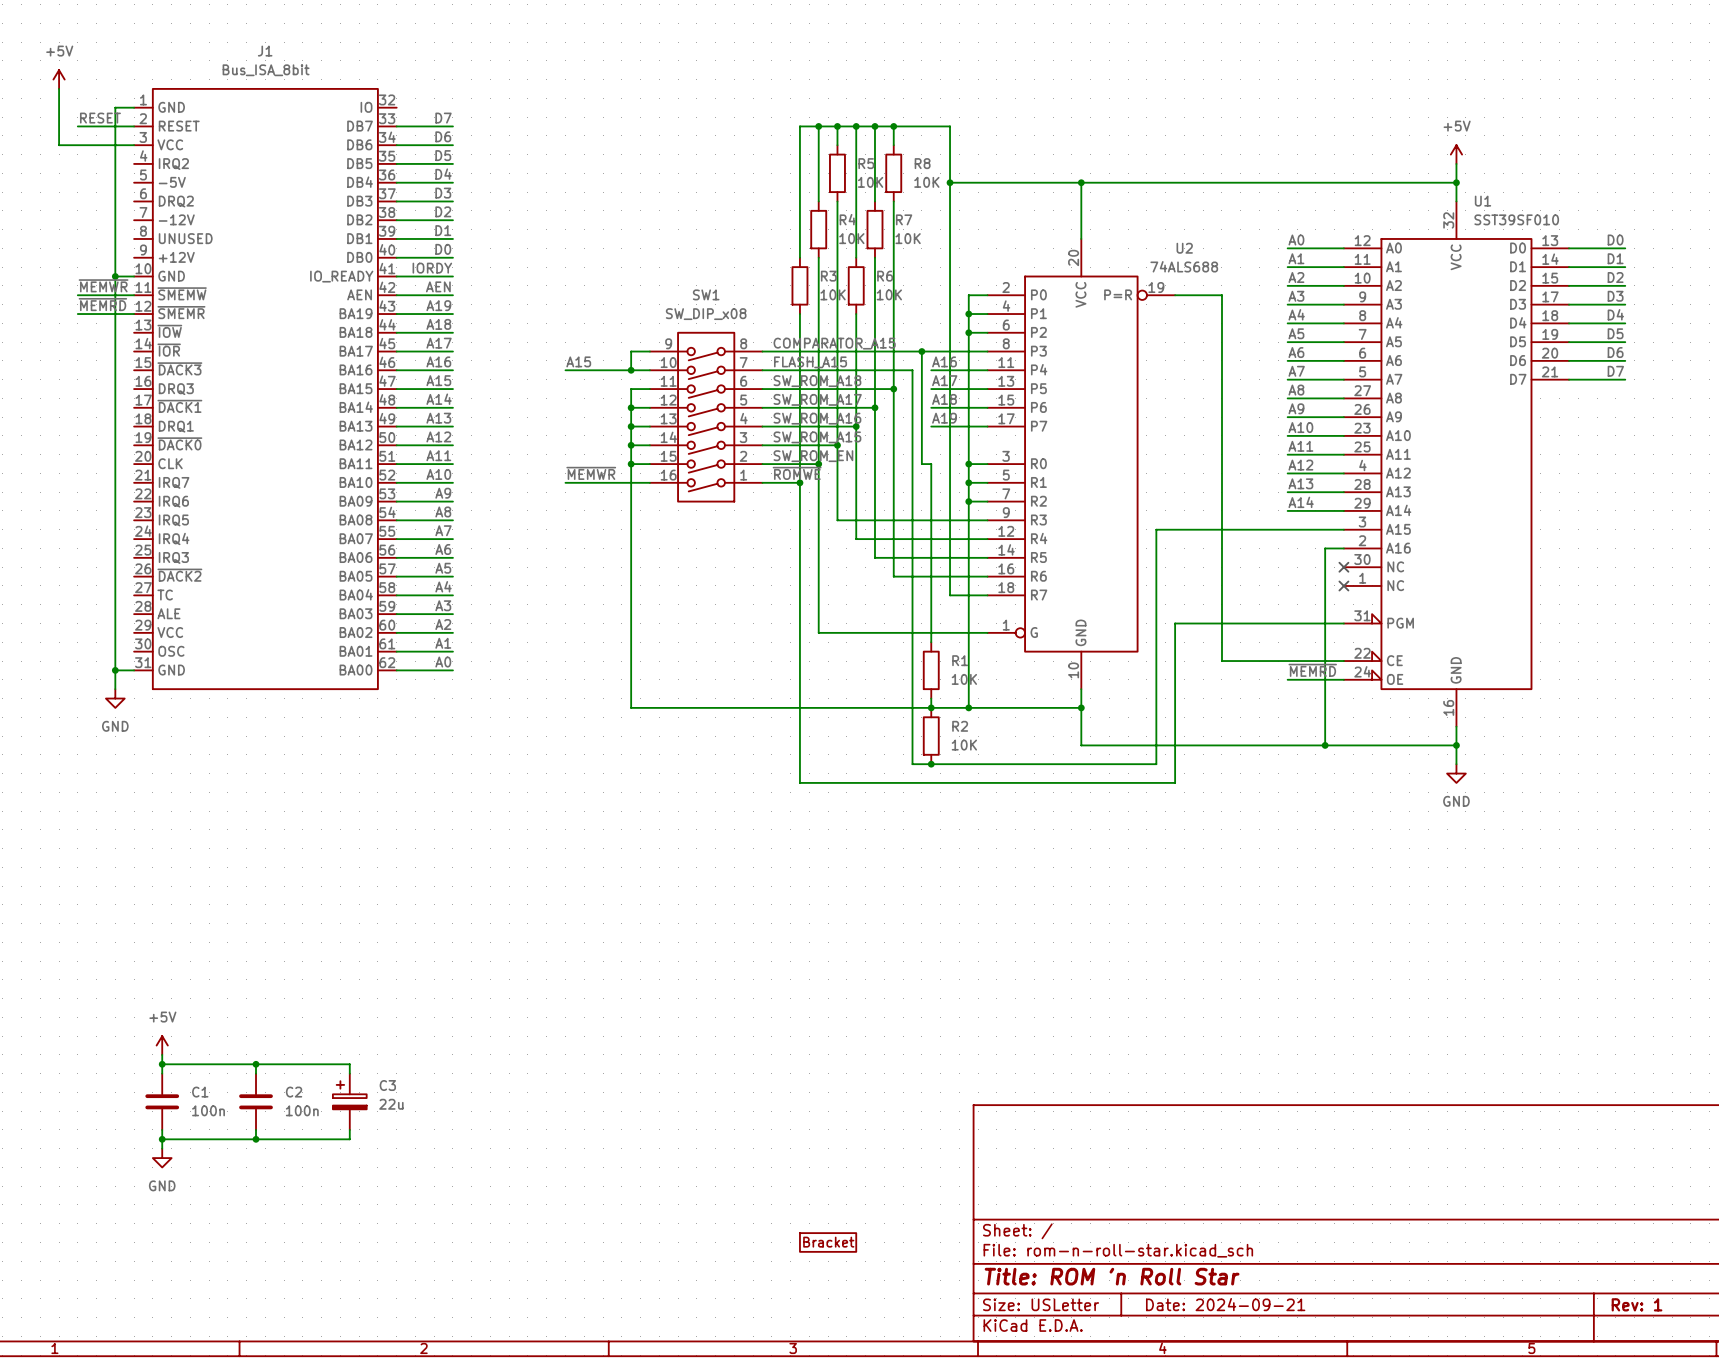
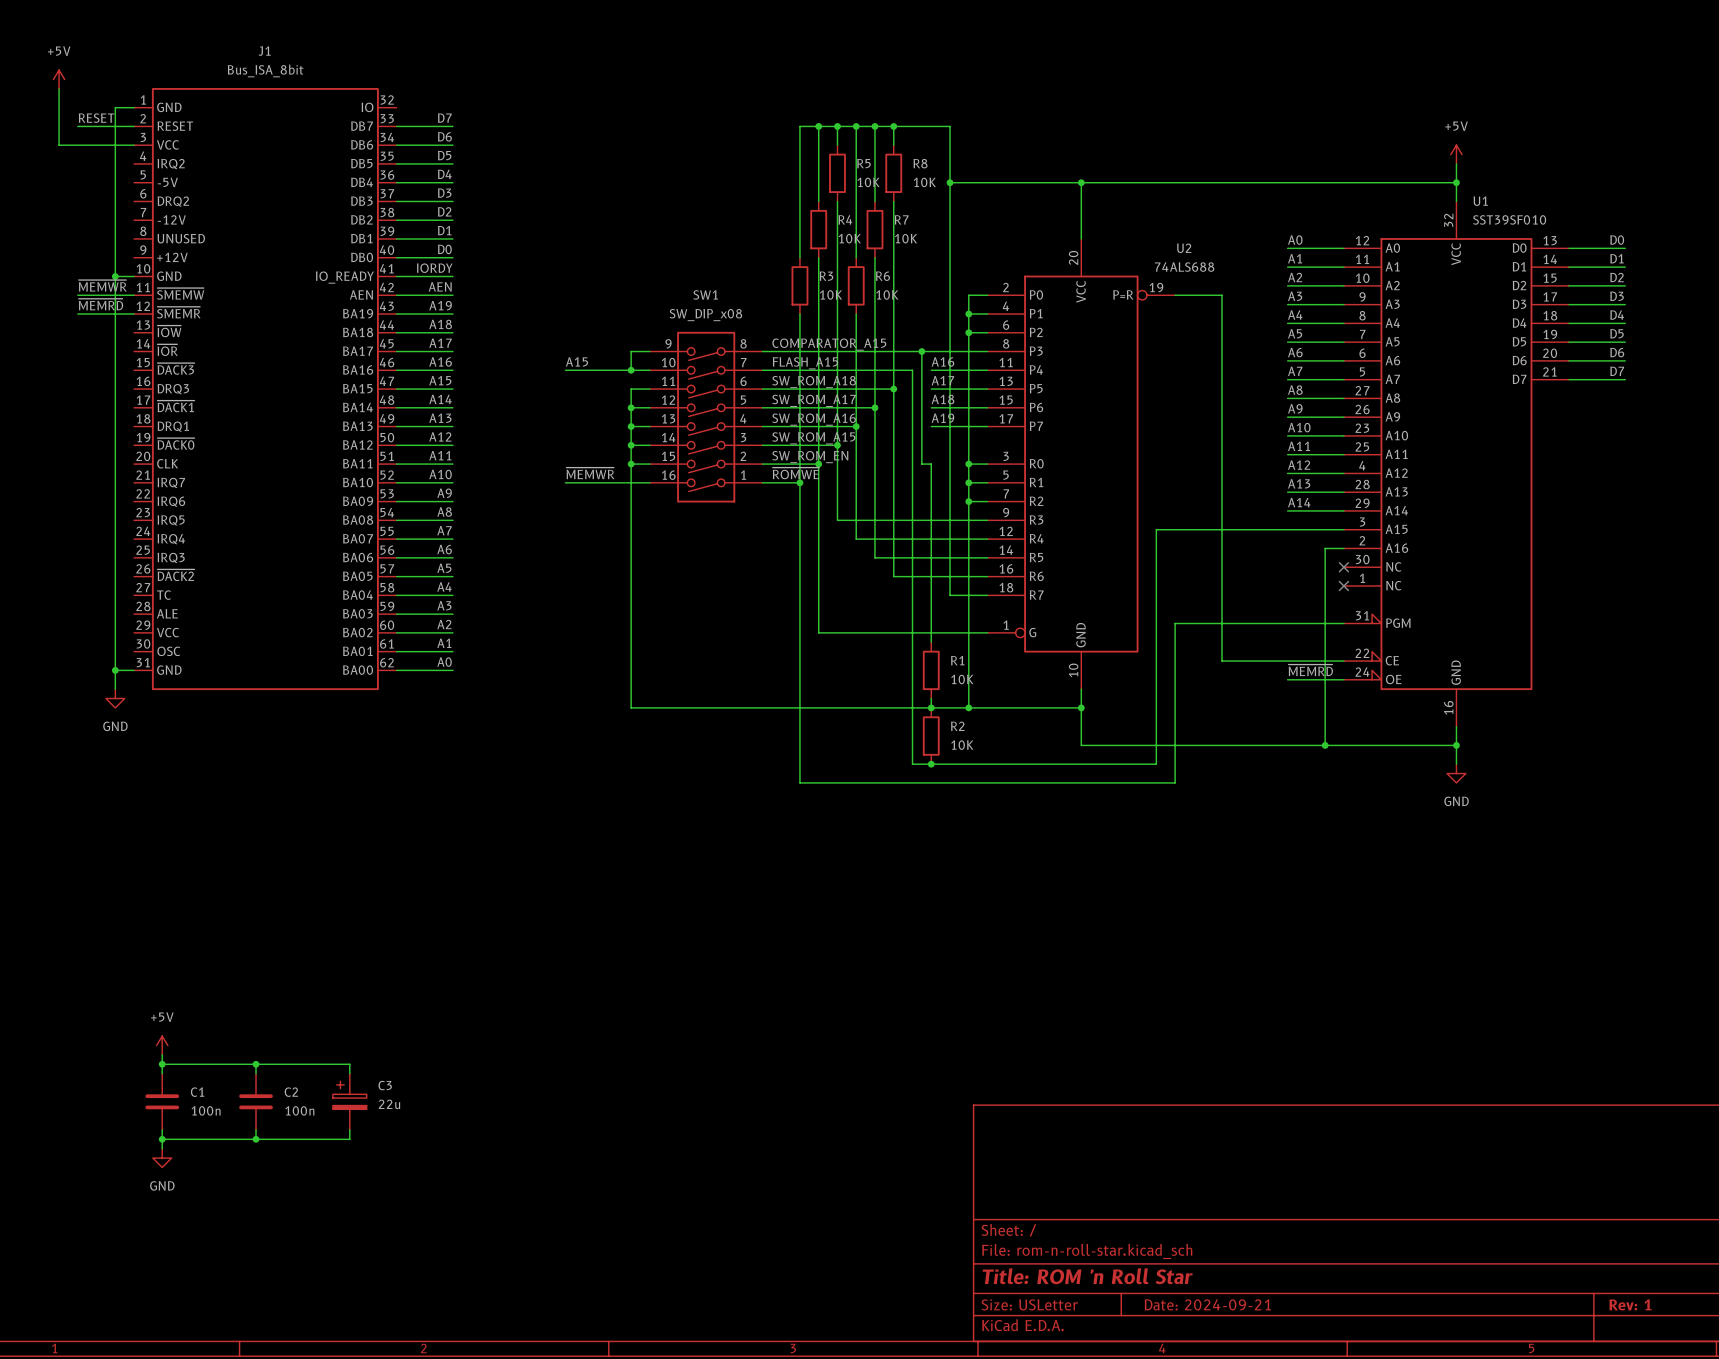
part: (828, 1242) -> none

